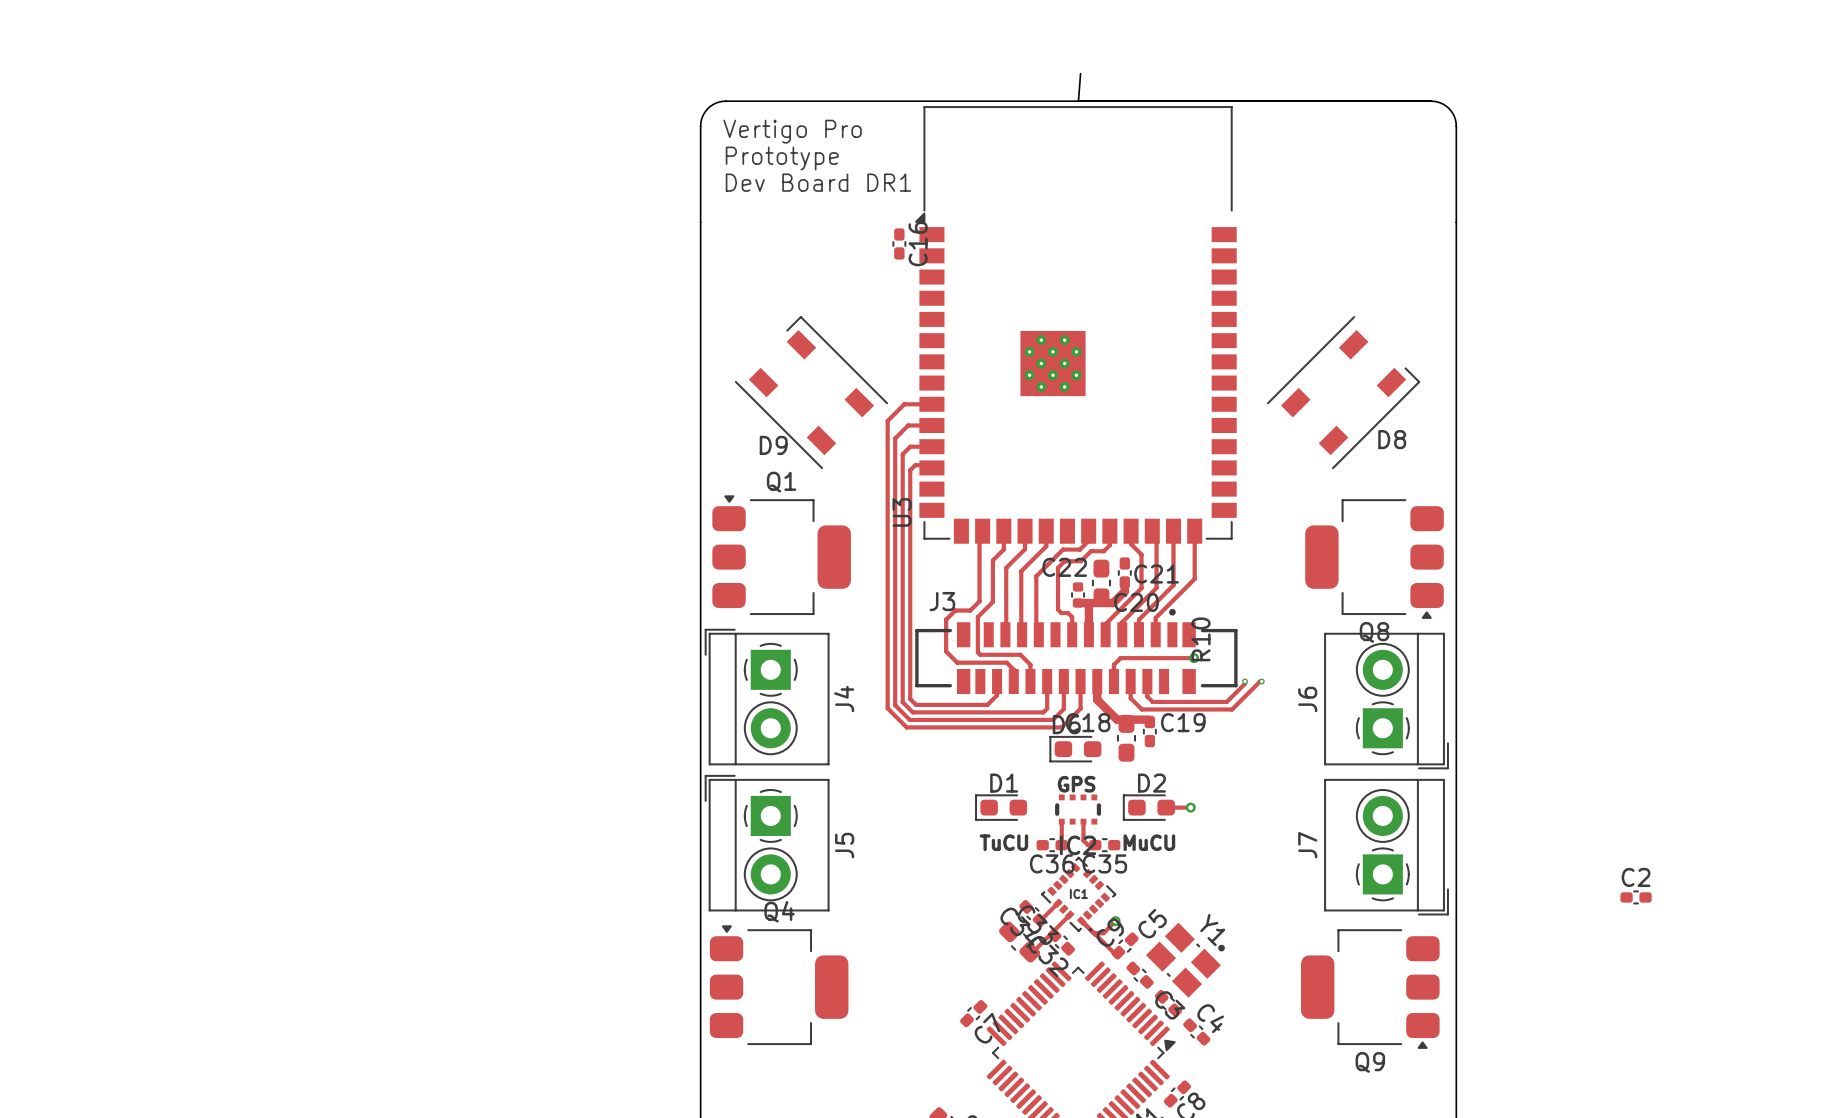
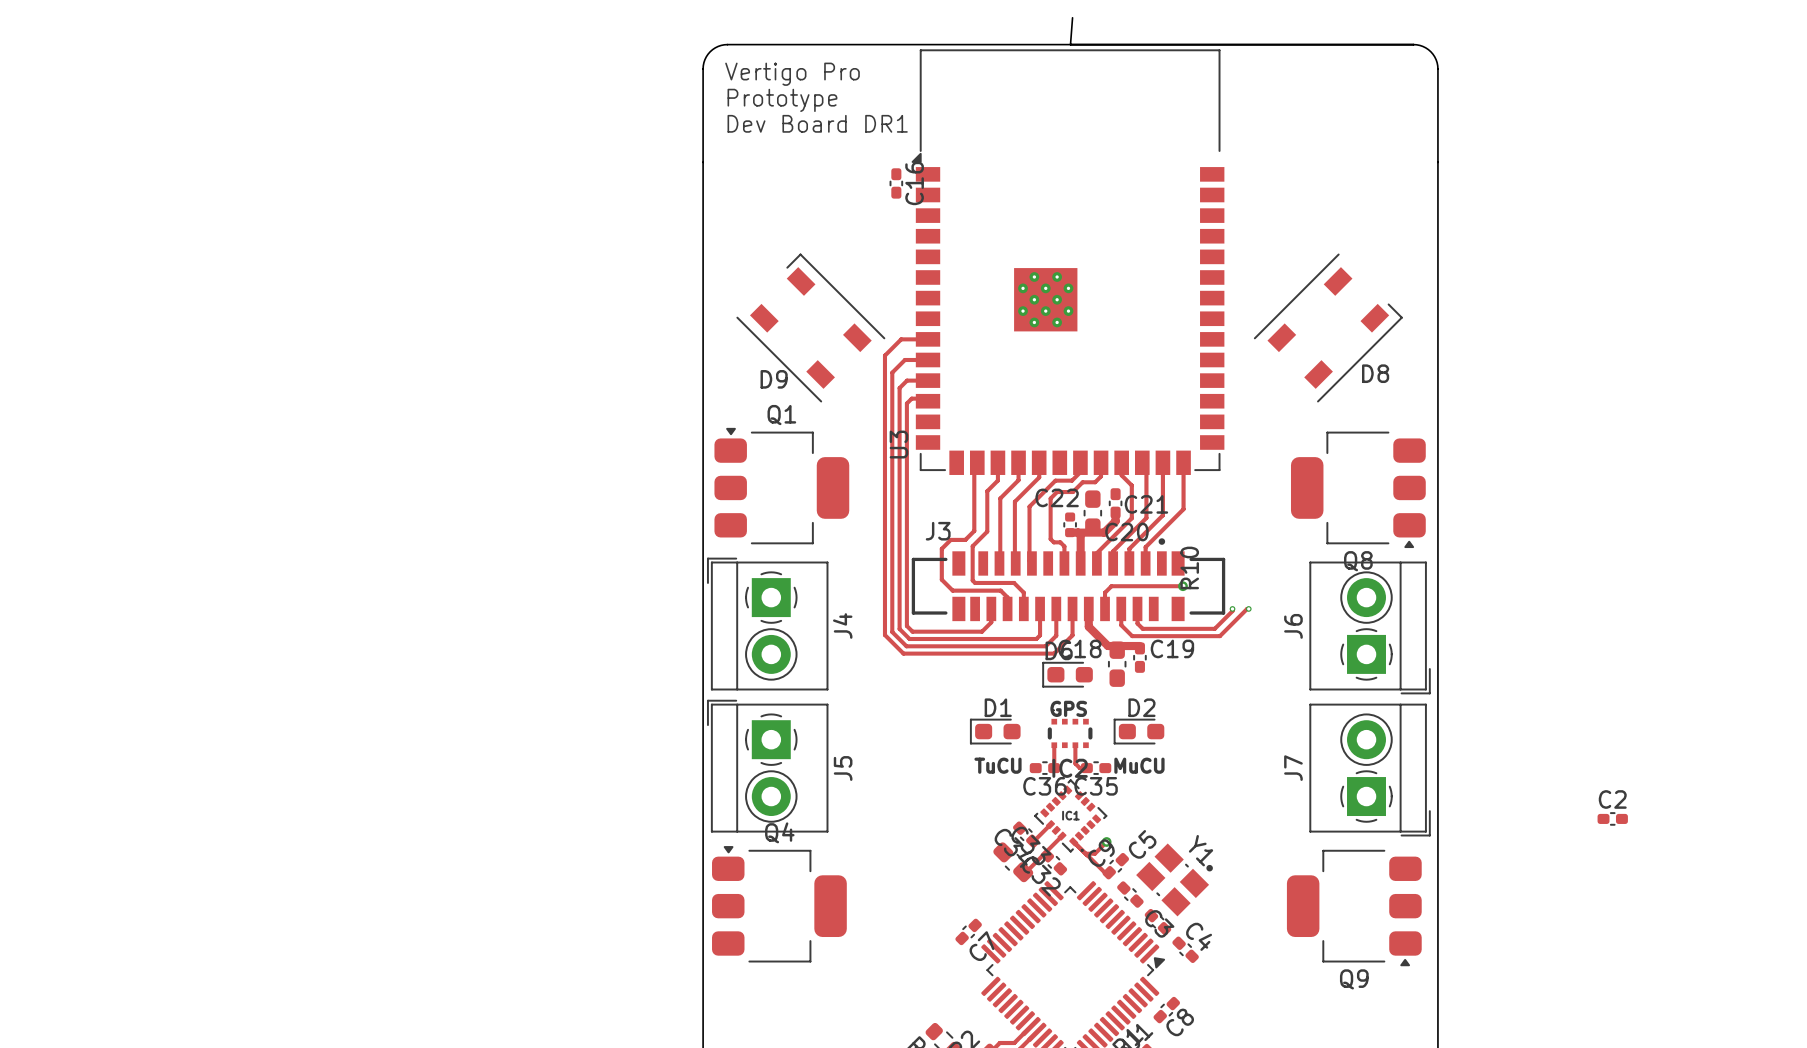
track: (1166, 807) (1190, 807) -> none
via: (1190, 807) -> none

